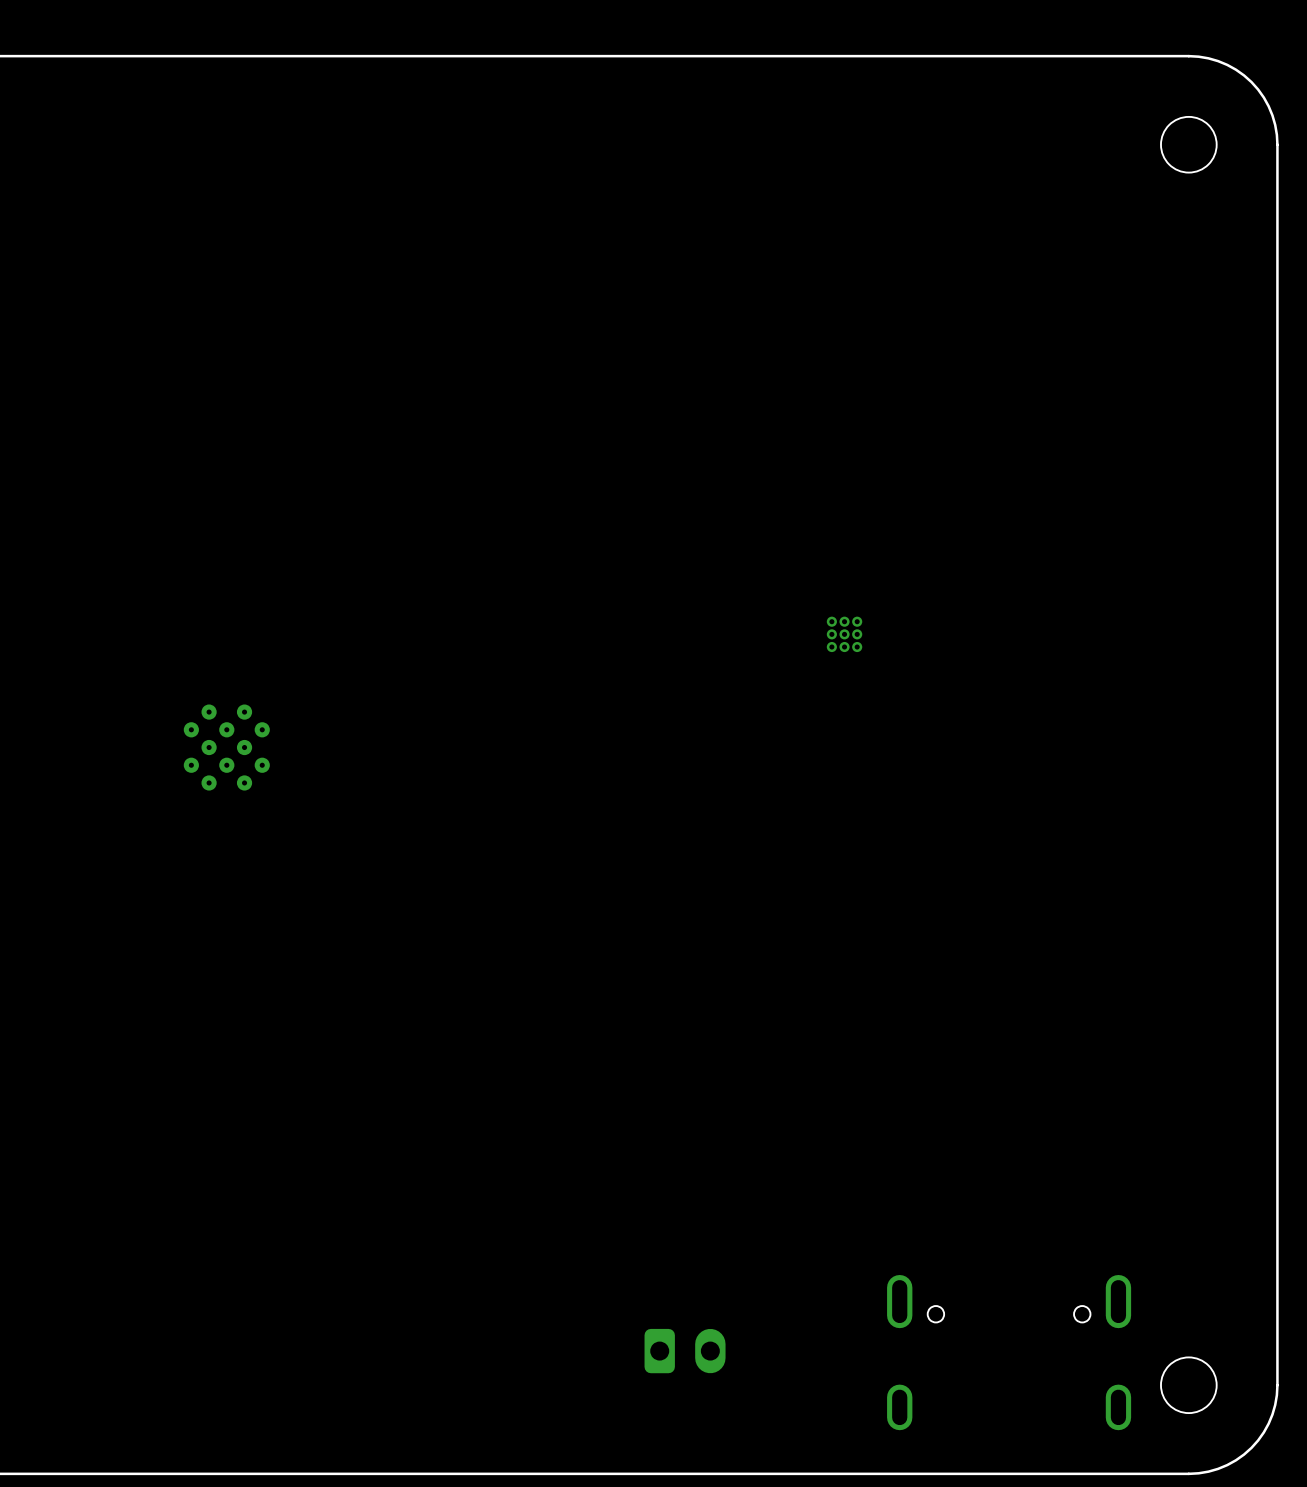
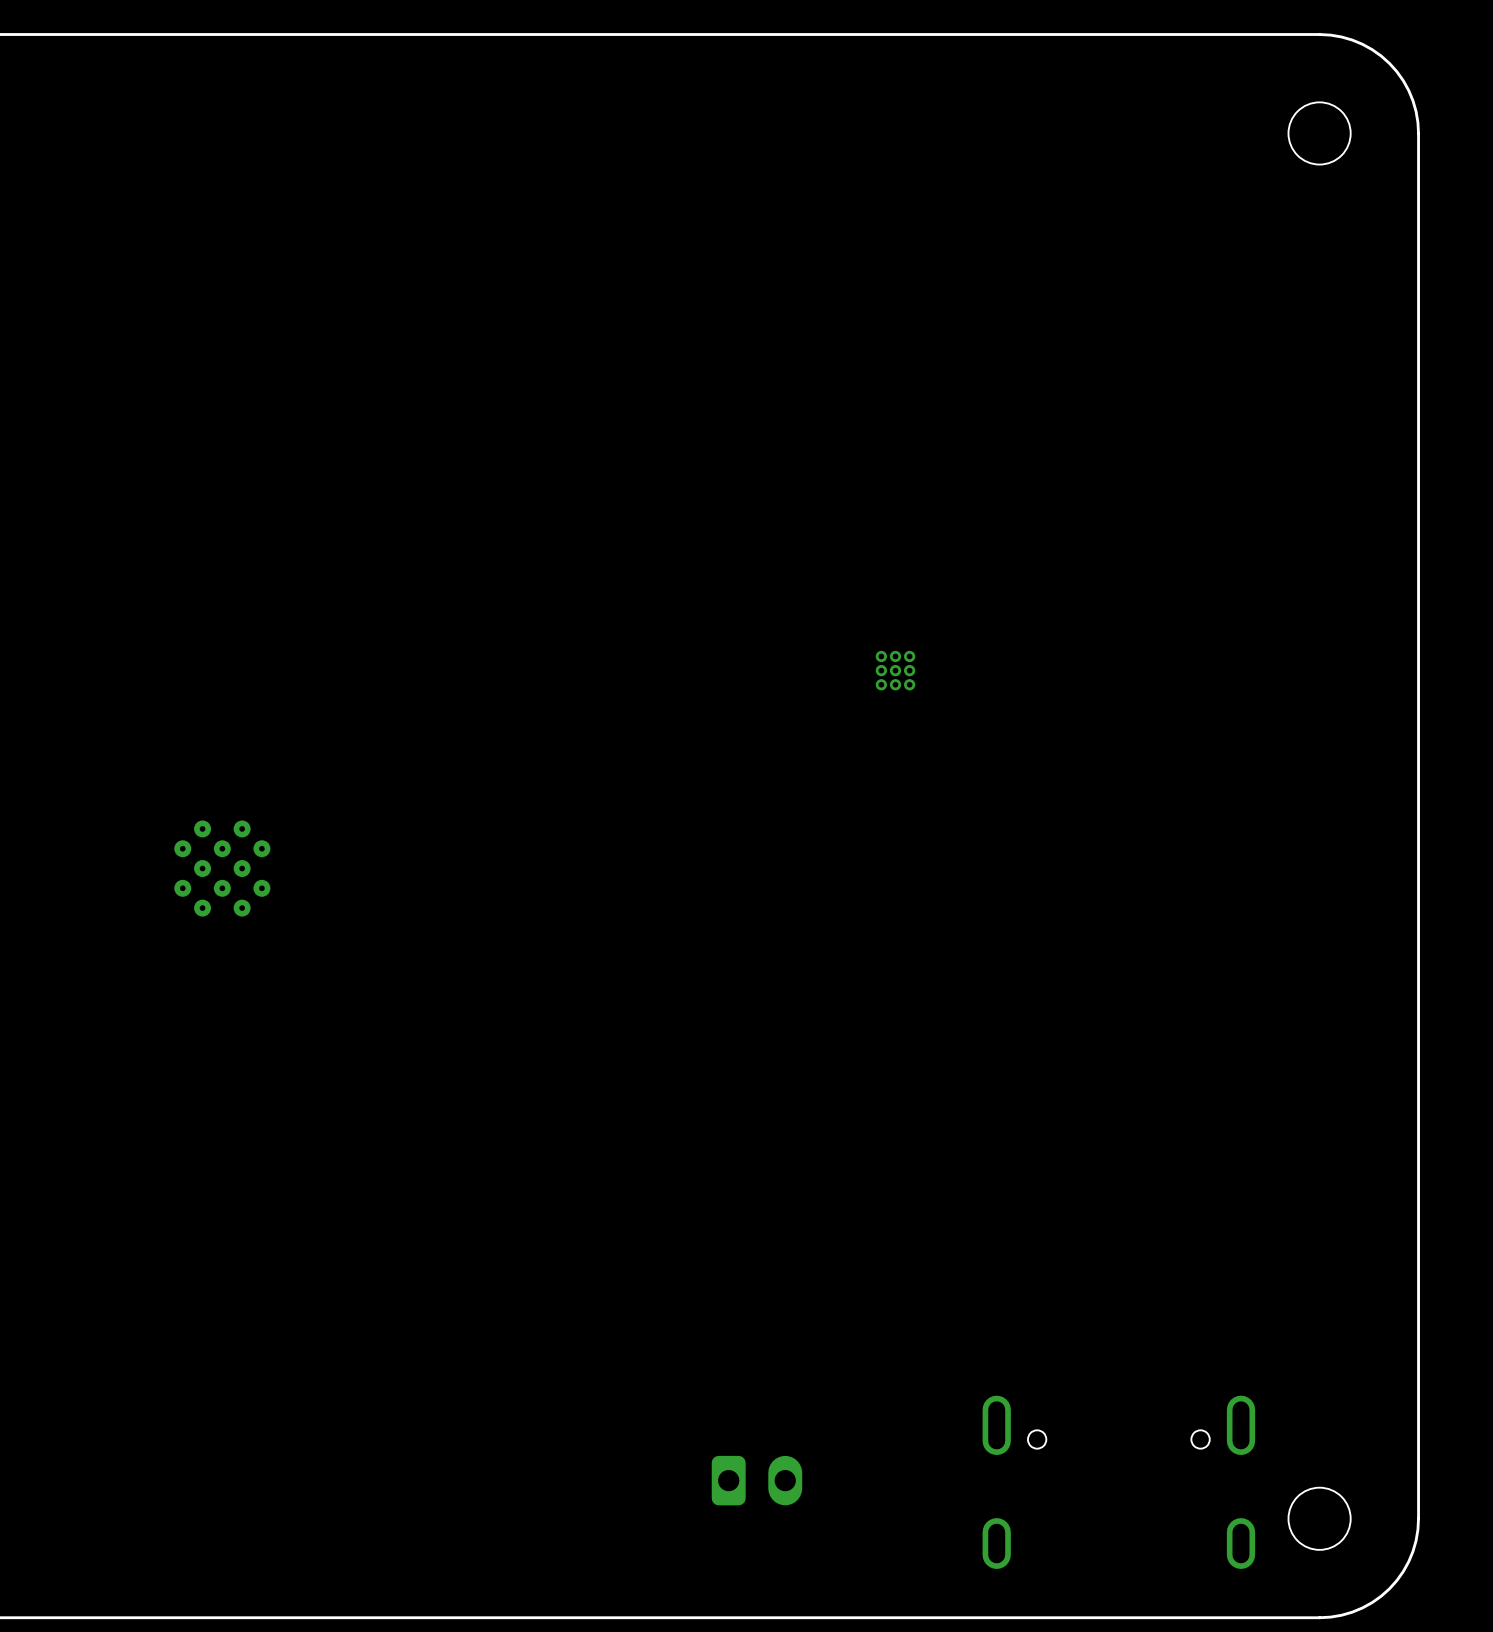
part position: (844, 634) -> (895, 670)
part position: (226, 747) -> (222, 868)

